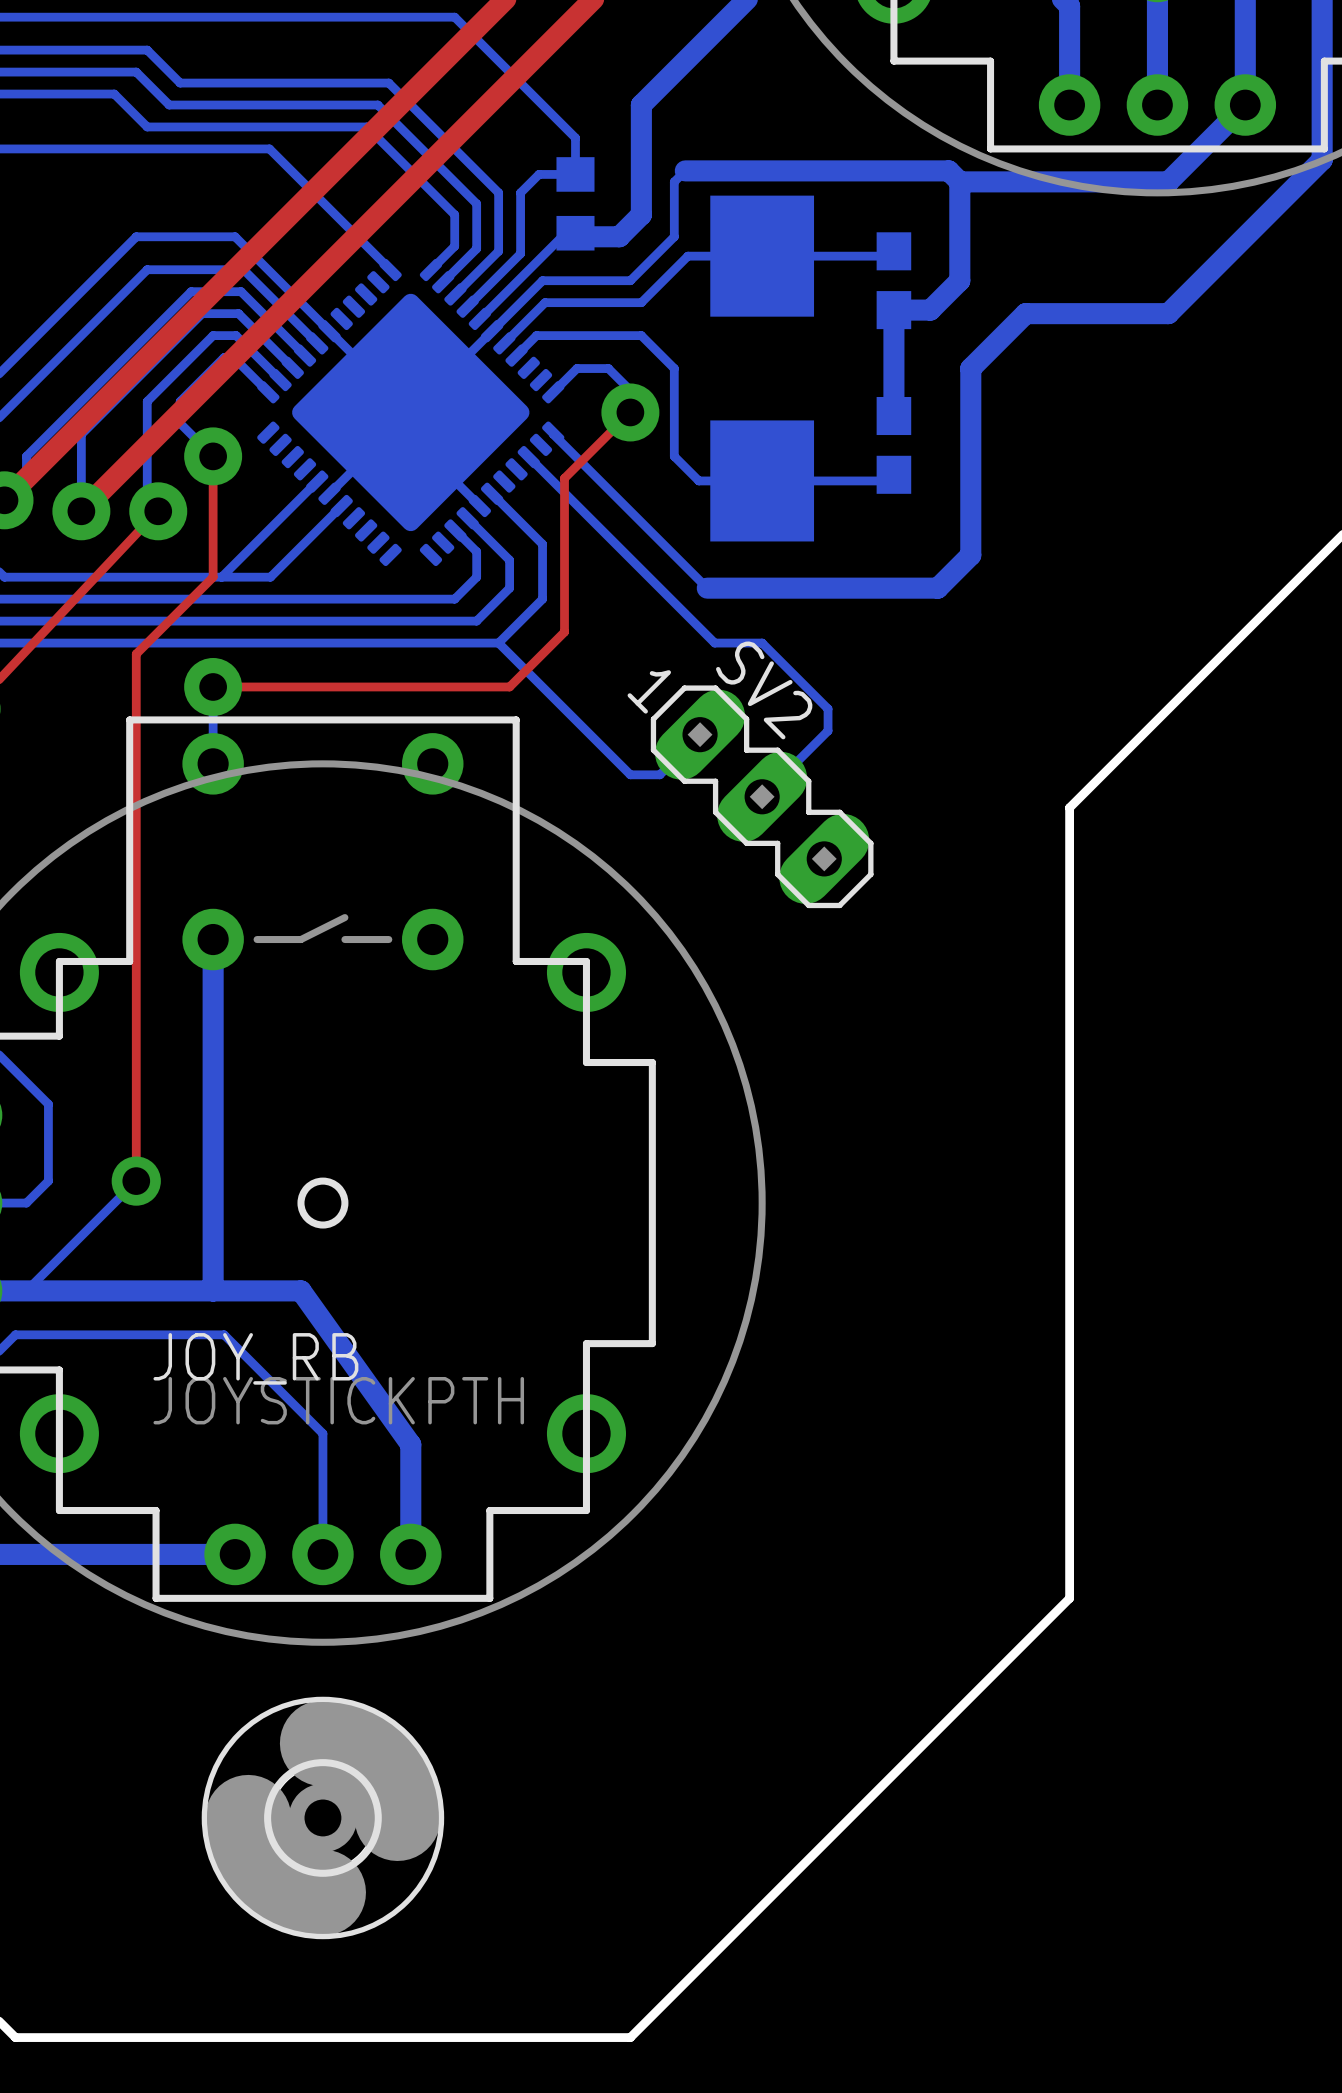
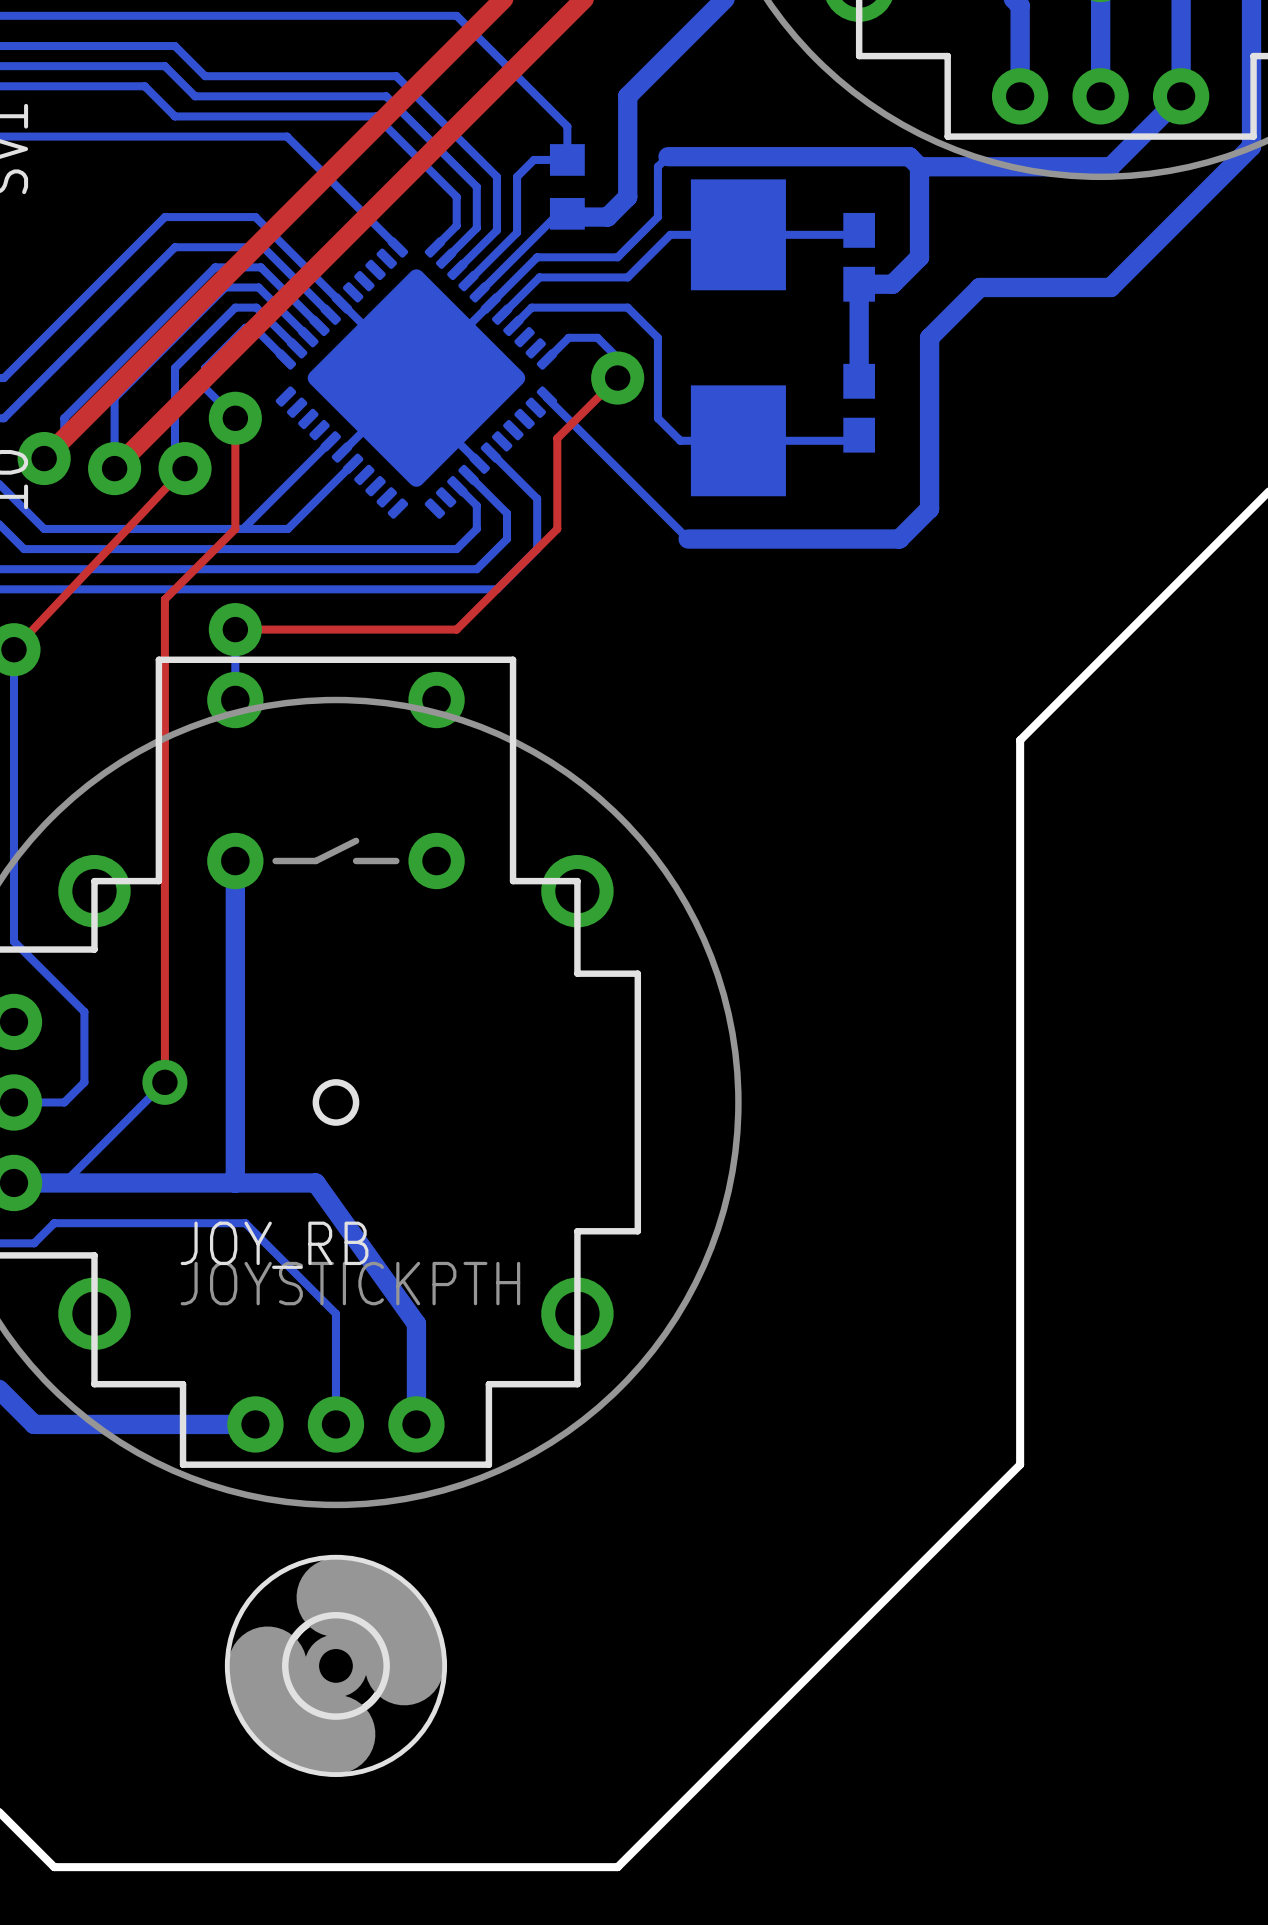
bottom track: (528, 457) (714, 643) (762, 643) (828, 708) (828, 730) (762, 796) -> none
top track: (564, 577) (564, 632) (509, 686) (454, 686) -> (557, 528) (456, 629)
bottom track: (498, 643) (630, 774) (659, 774) (700, 734) -> none
SV2: (762, 796) -> none

